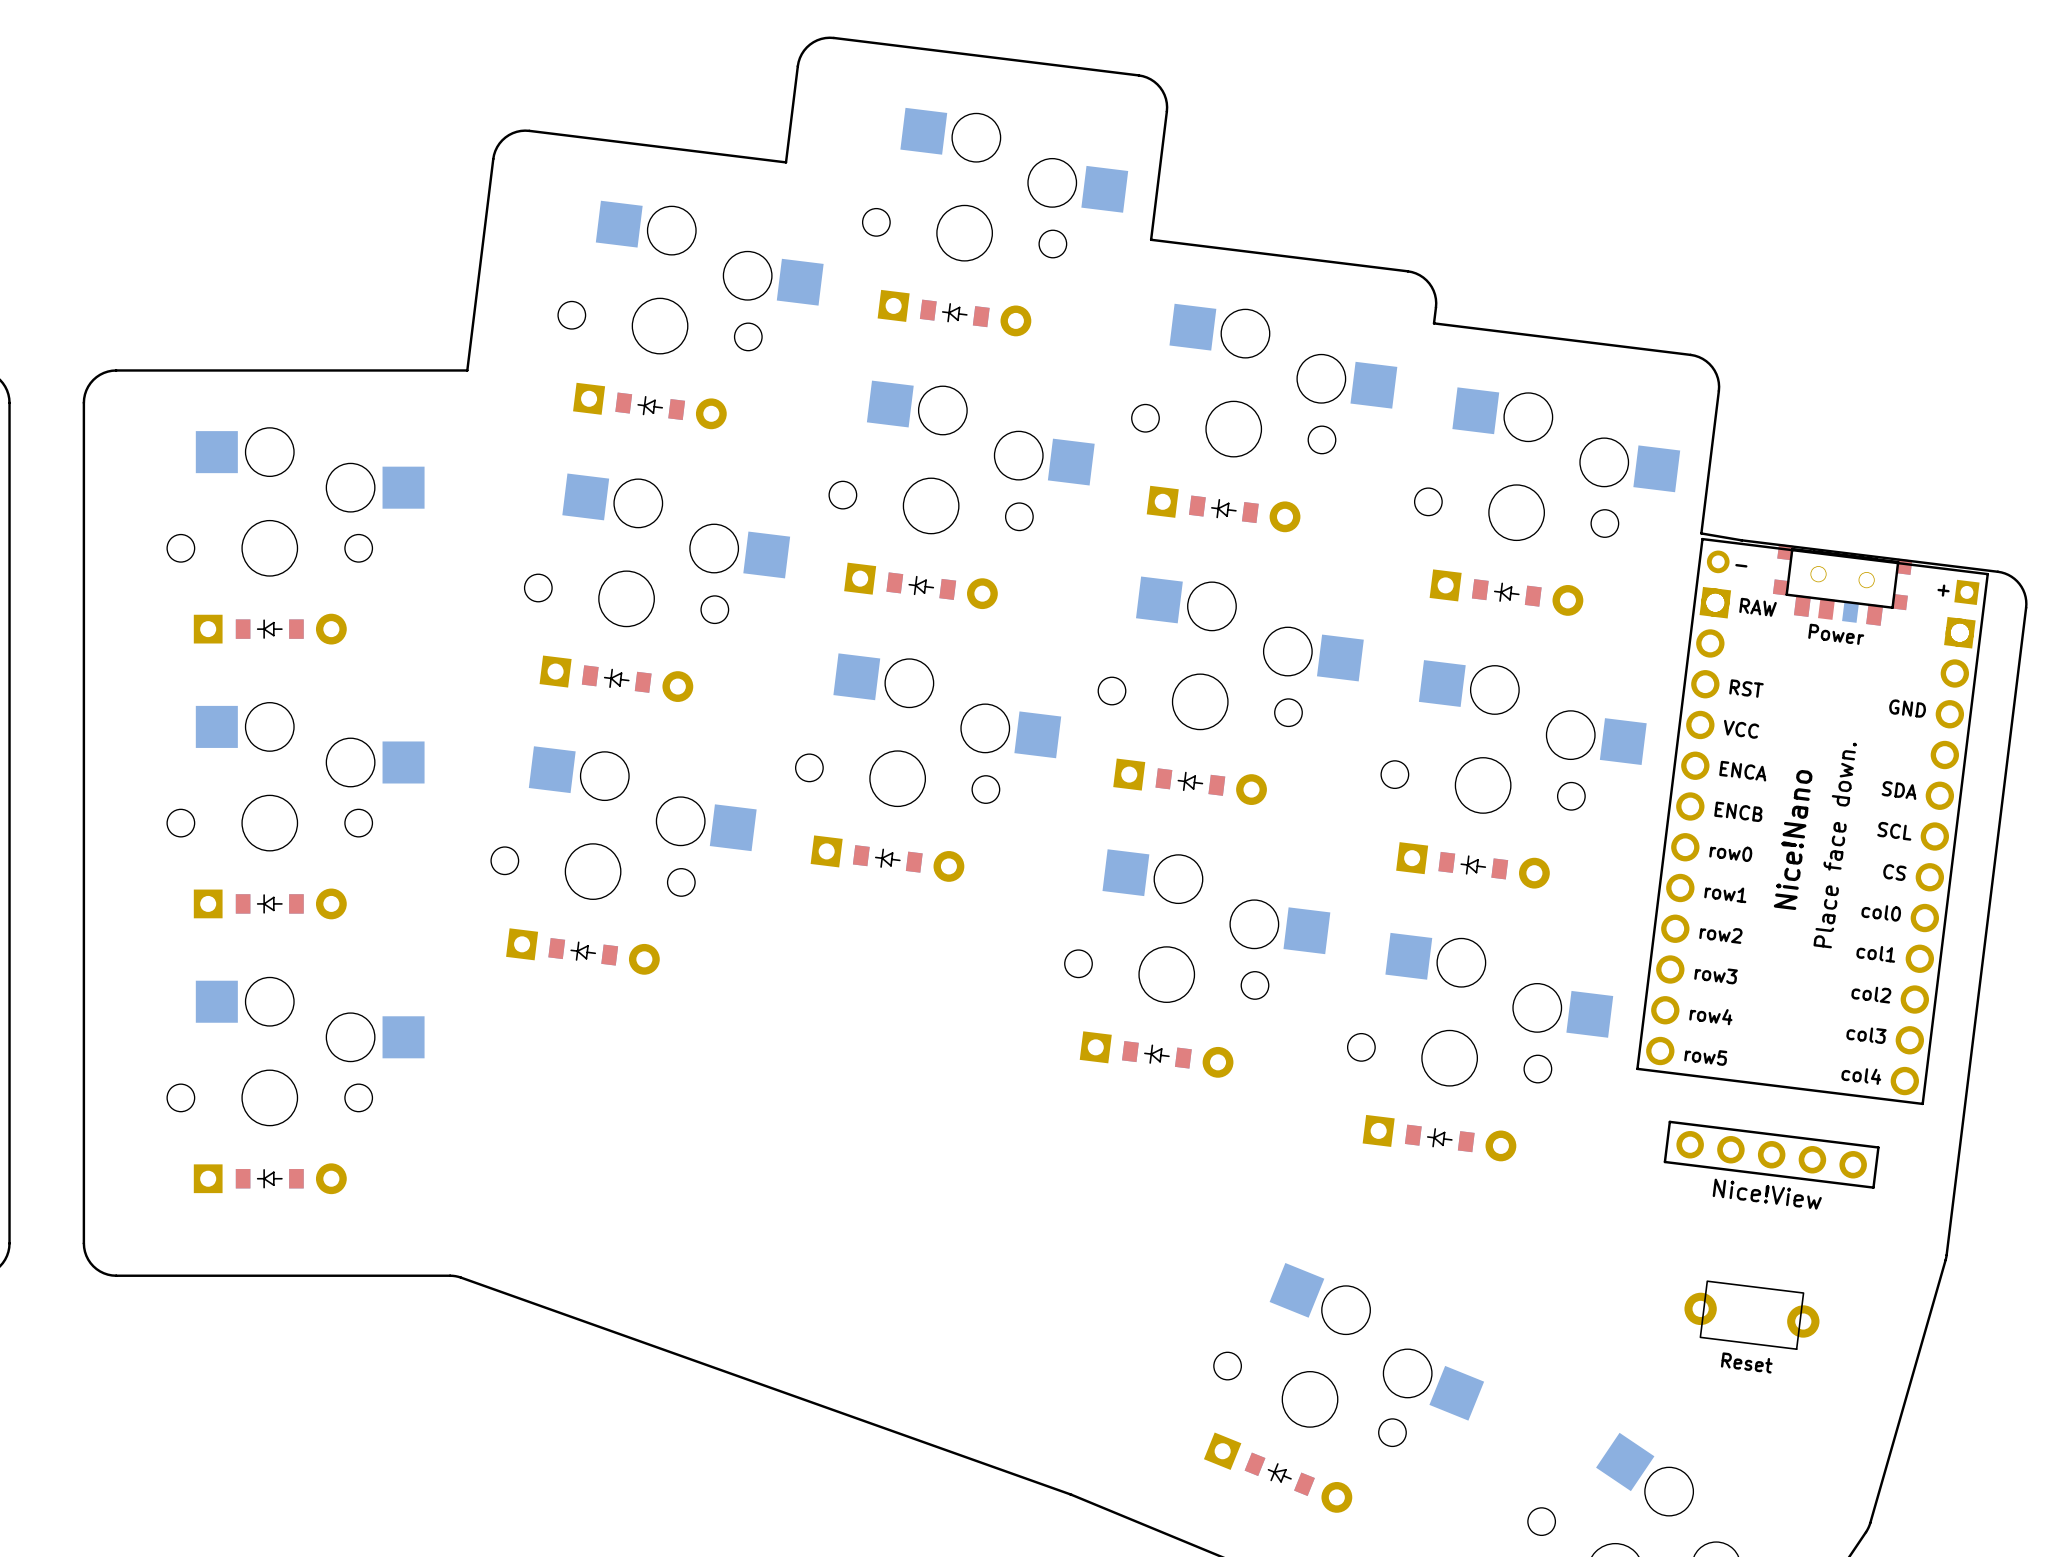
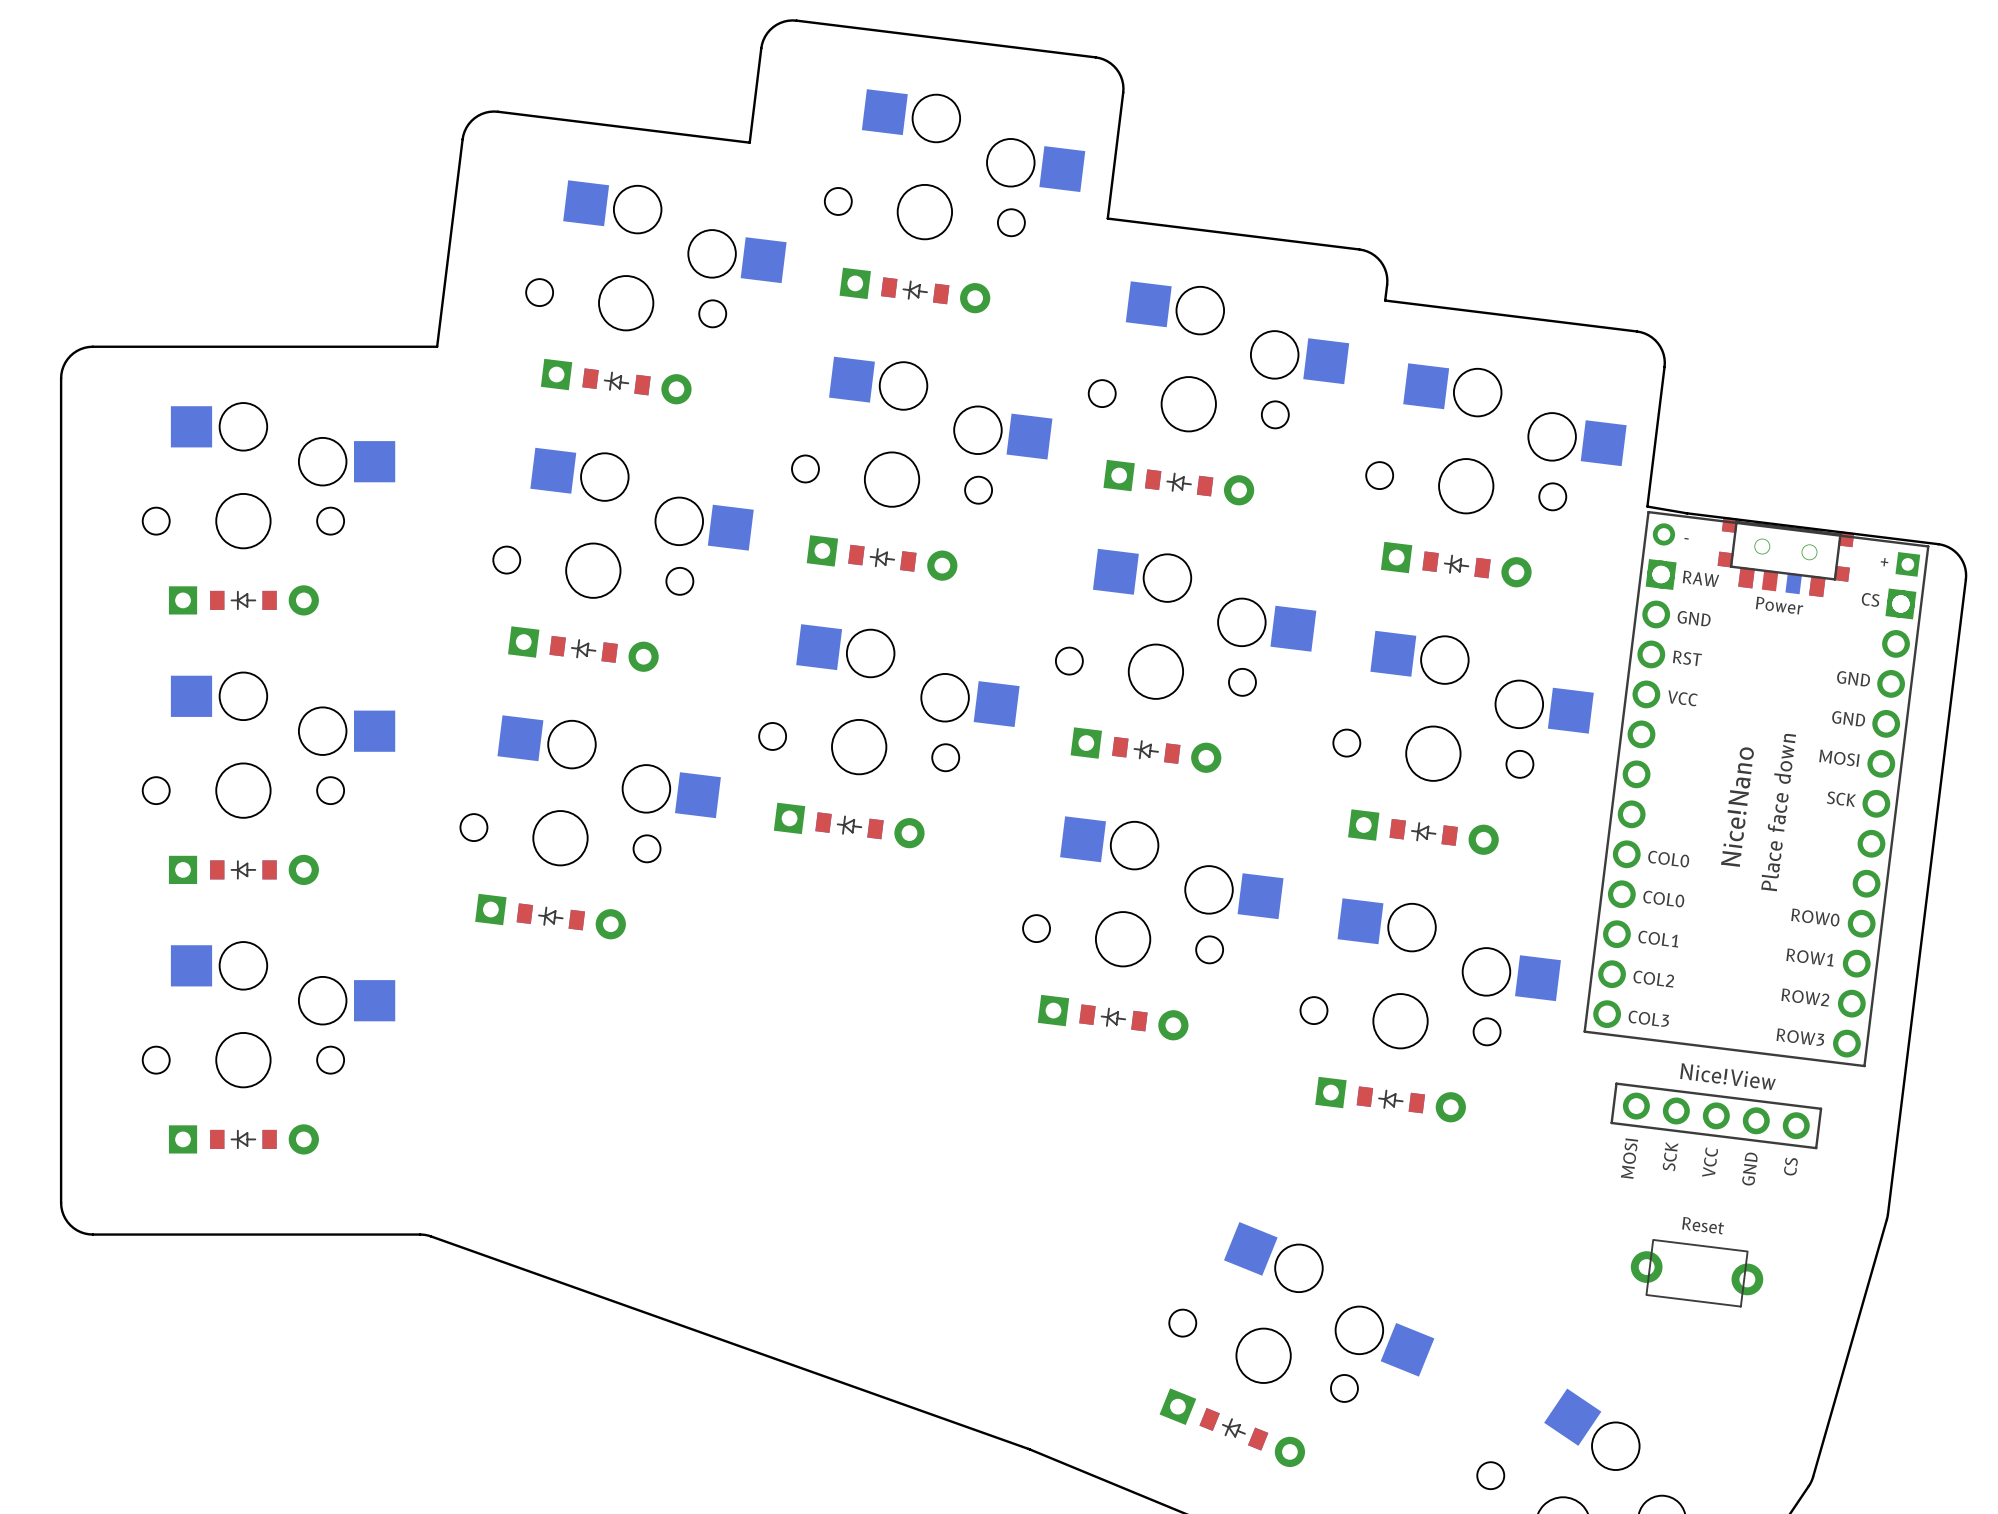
part footprint: [1636, 537, 1989, 1106] -> [1583, 510, 1930, 1068]
part text position: Nice!View (1767, 1194) -> Nice!View (1727, 1076)
part text: none -> MOSI (1629, 1158)
part text: none -> SCK (1670, 1156)
part text: none -> VCC (1710, 1161)
part text: none -> CS (1790, 1166)
part text: none -> GND (1749, 1169)
part rotation: 0° (1751, 1315) -> 180° (1697, 1273)

